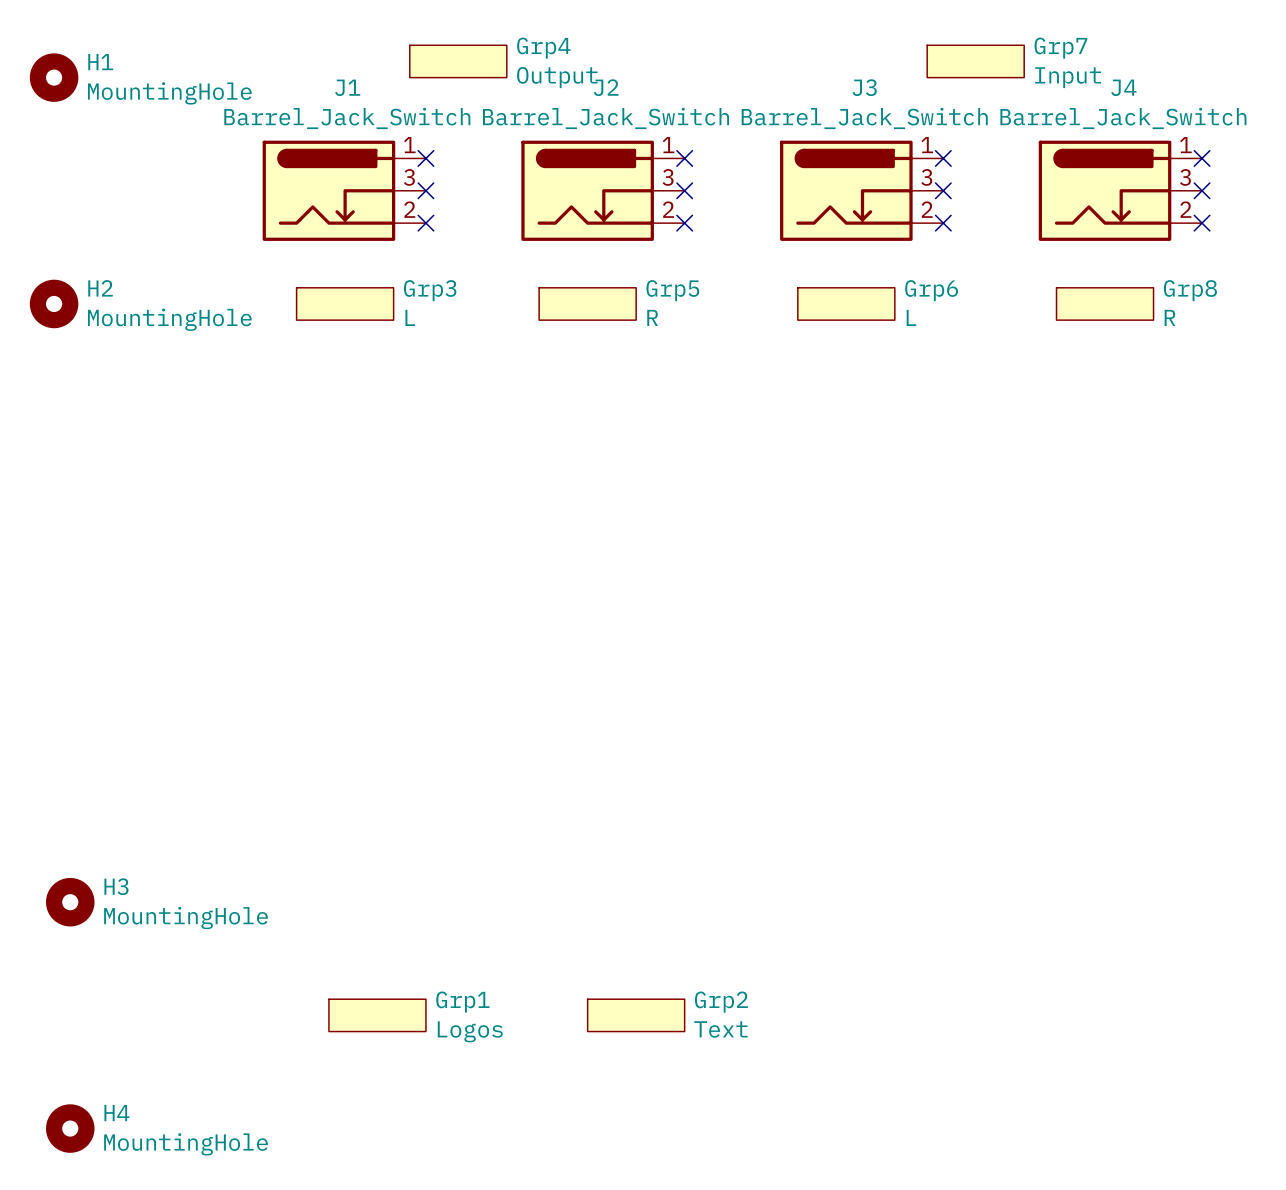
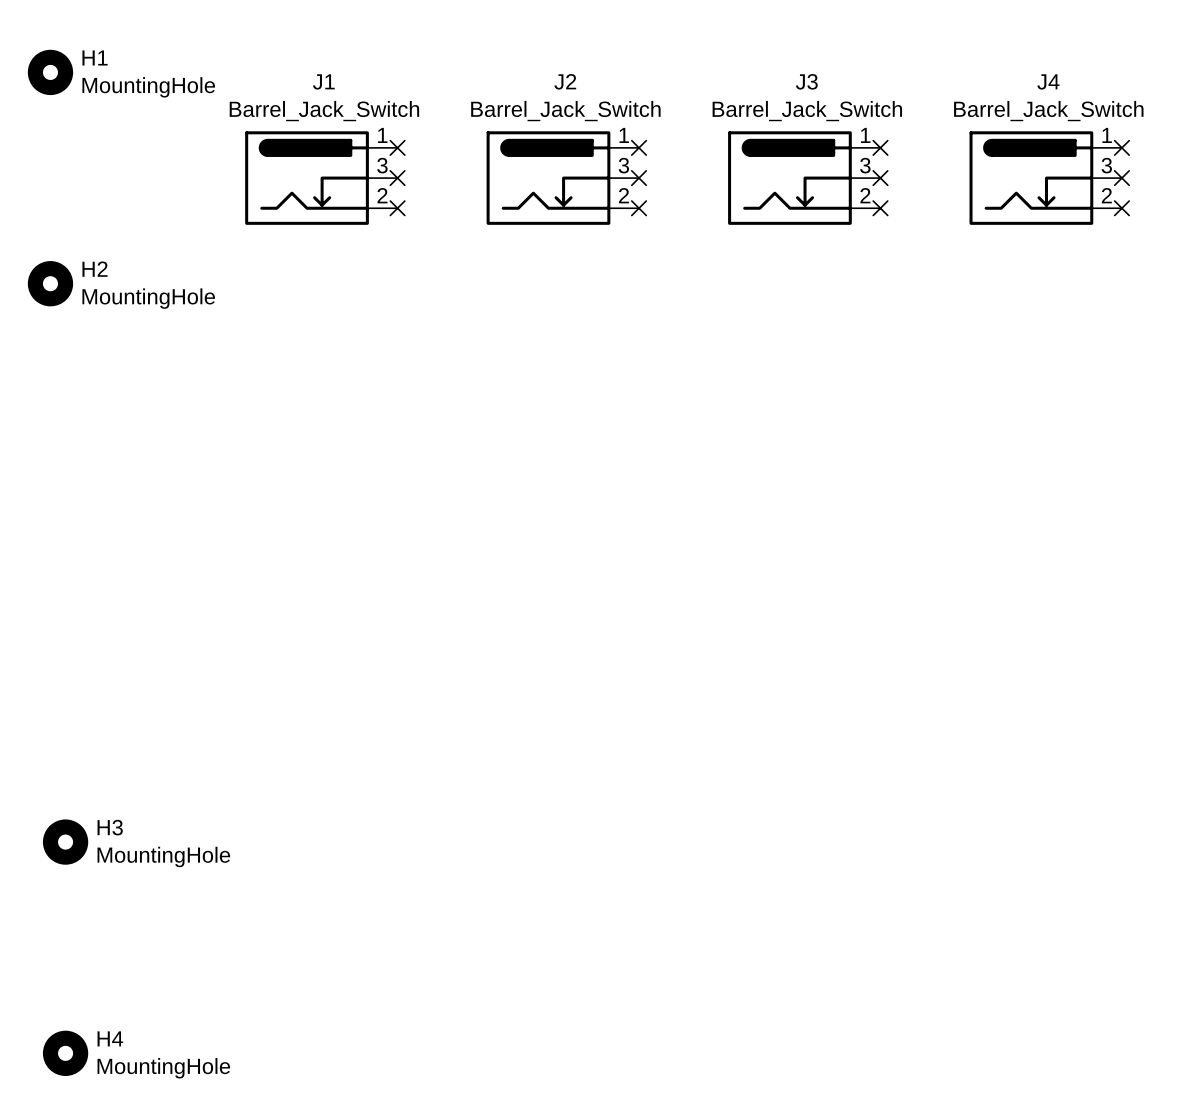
Grp4: Output (458, 61) -> none
Grp7: Input (975, 61) -> none
Grp3: L (345, 303) -> none
Grp5: R (587, 303) -> none
Grp6: L (846, 303) -> none
Grp8: R (1105, 303) -> none
Grp1: Logos (377, 1015) -> none
Grp2: Text (636, 1015) -> none

